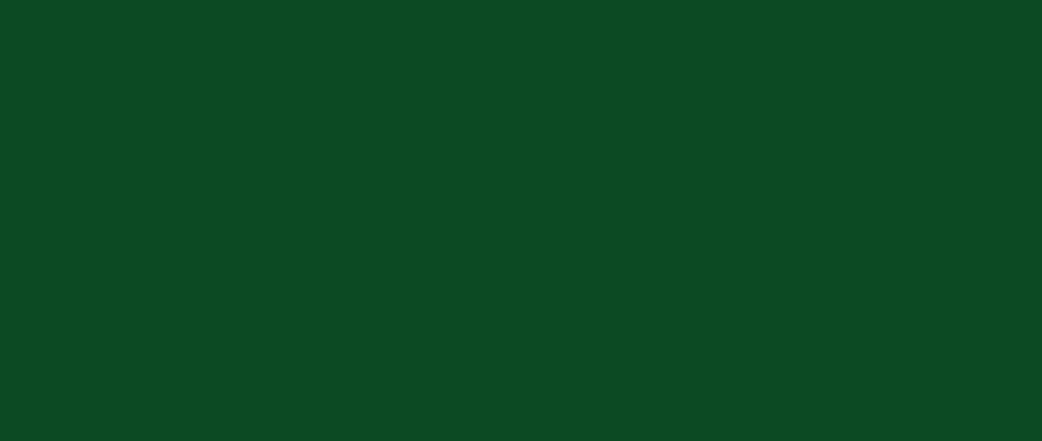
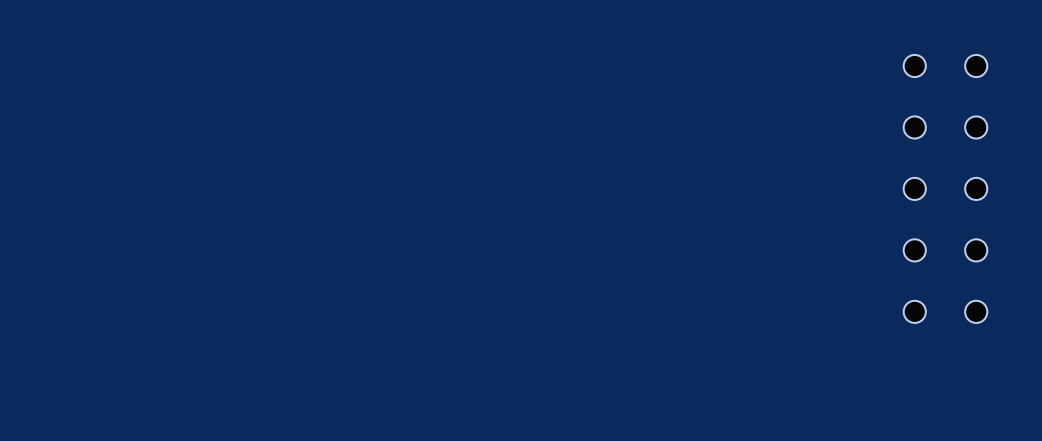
part: none -> (914, 66)
part: none -> (976, 66)
part: none -> (914, 127)
part: none -> (976, 127)
part: none -> (914, 188)
part: none -> (976, 188)
part: none -> (914, 250)
part: none -> (976, 250)
part: none -> (914, 311)
part: none -> (976, 311)

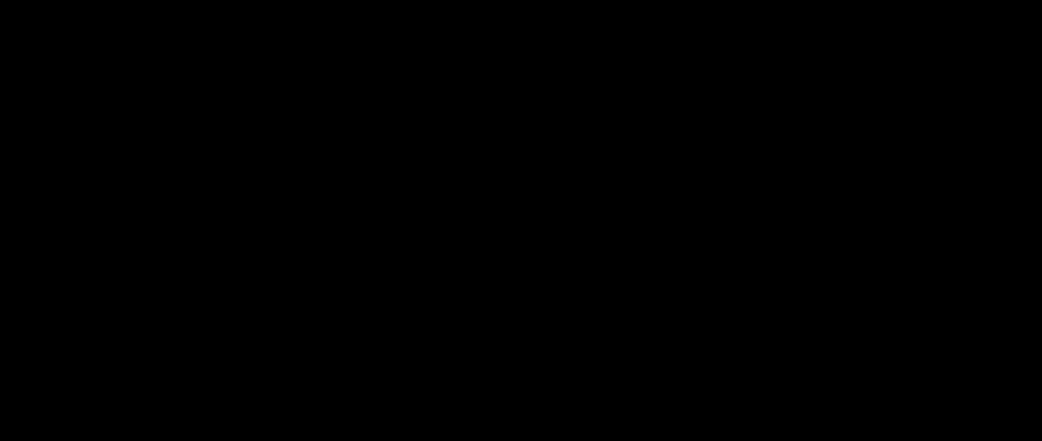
part: (914, 66) -> none
part: (976, 66) -> none
part: (914, 127) -> none
part: (976, 127) -> none
part: (914, 188) -> none
part: (976, 188) -> none
part: (914, 250) -> none
part: (976, 250) -> none
part: (914, 311) -> none
part: (976, 311) -> none

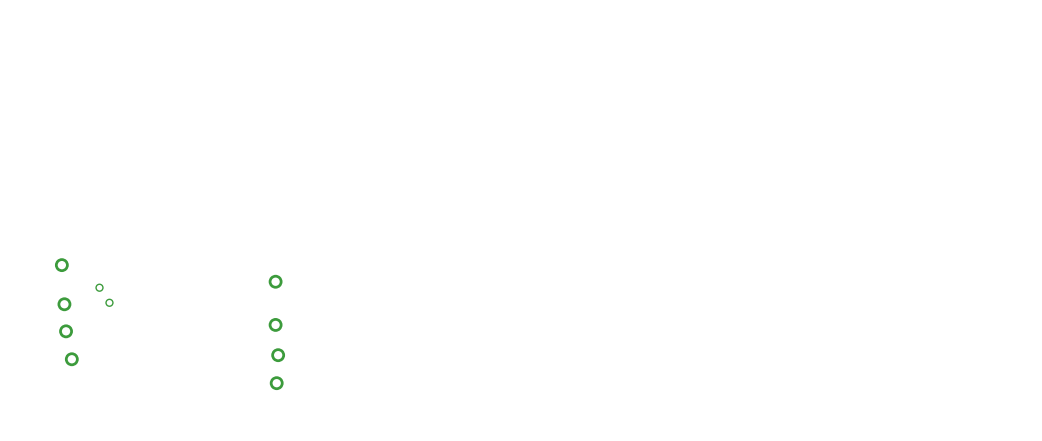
via: none -> (61, 265)
via: none -> (275, 281)
via: none -> (99, 287)
via: none -> (109, 302)
via: none -> (64, 304)
via: none -> (275, 324)
via: none -> (66, 331)
via: none -> (278, 355)
via: none -> (71, 359)
via: none -> (276, 383)

